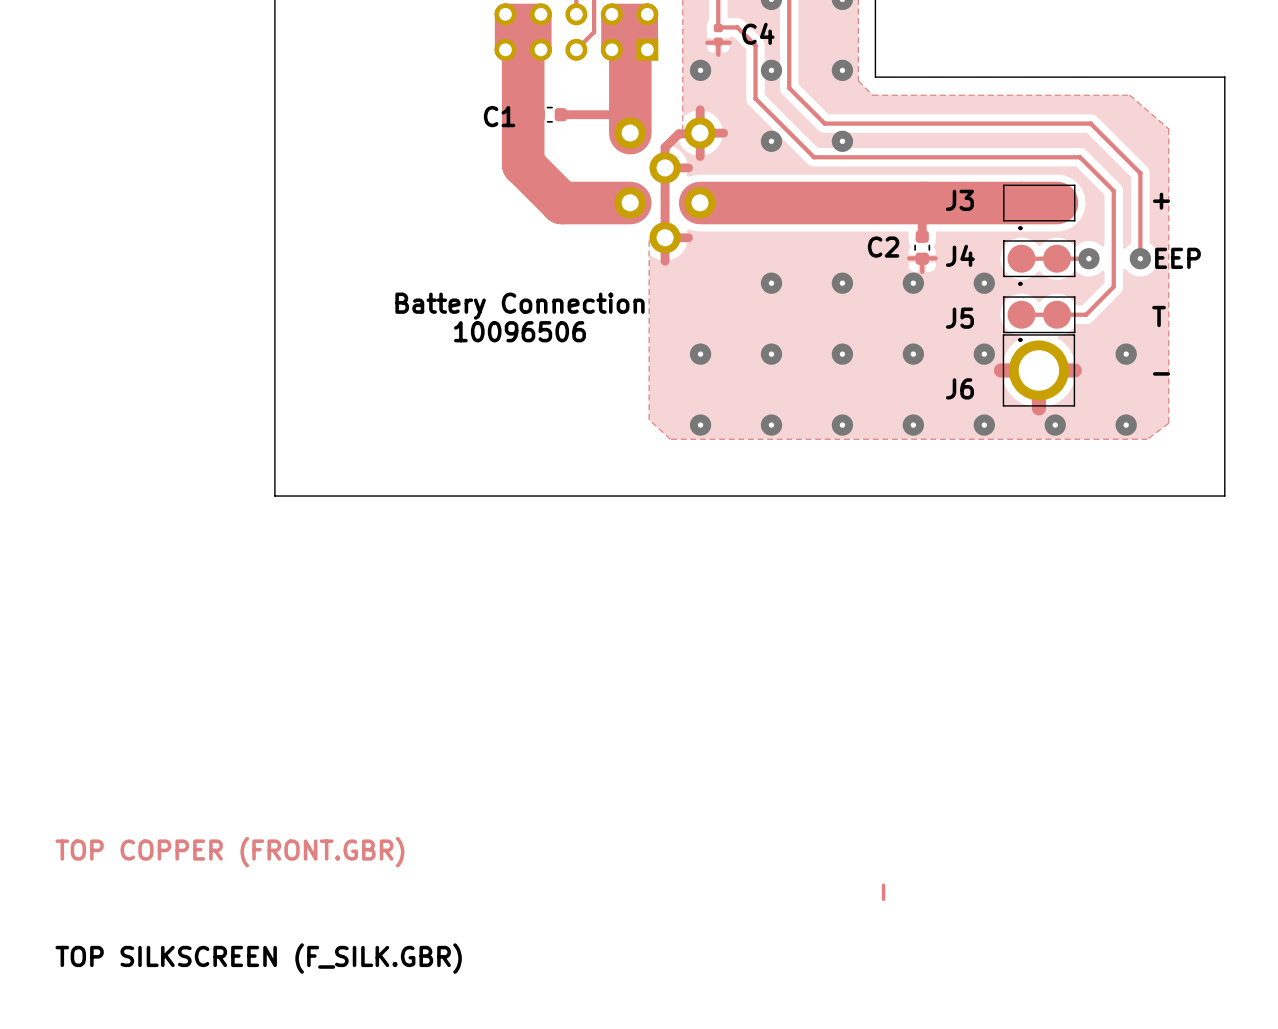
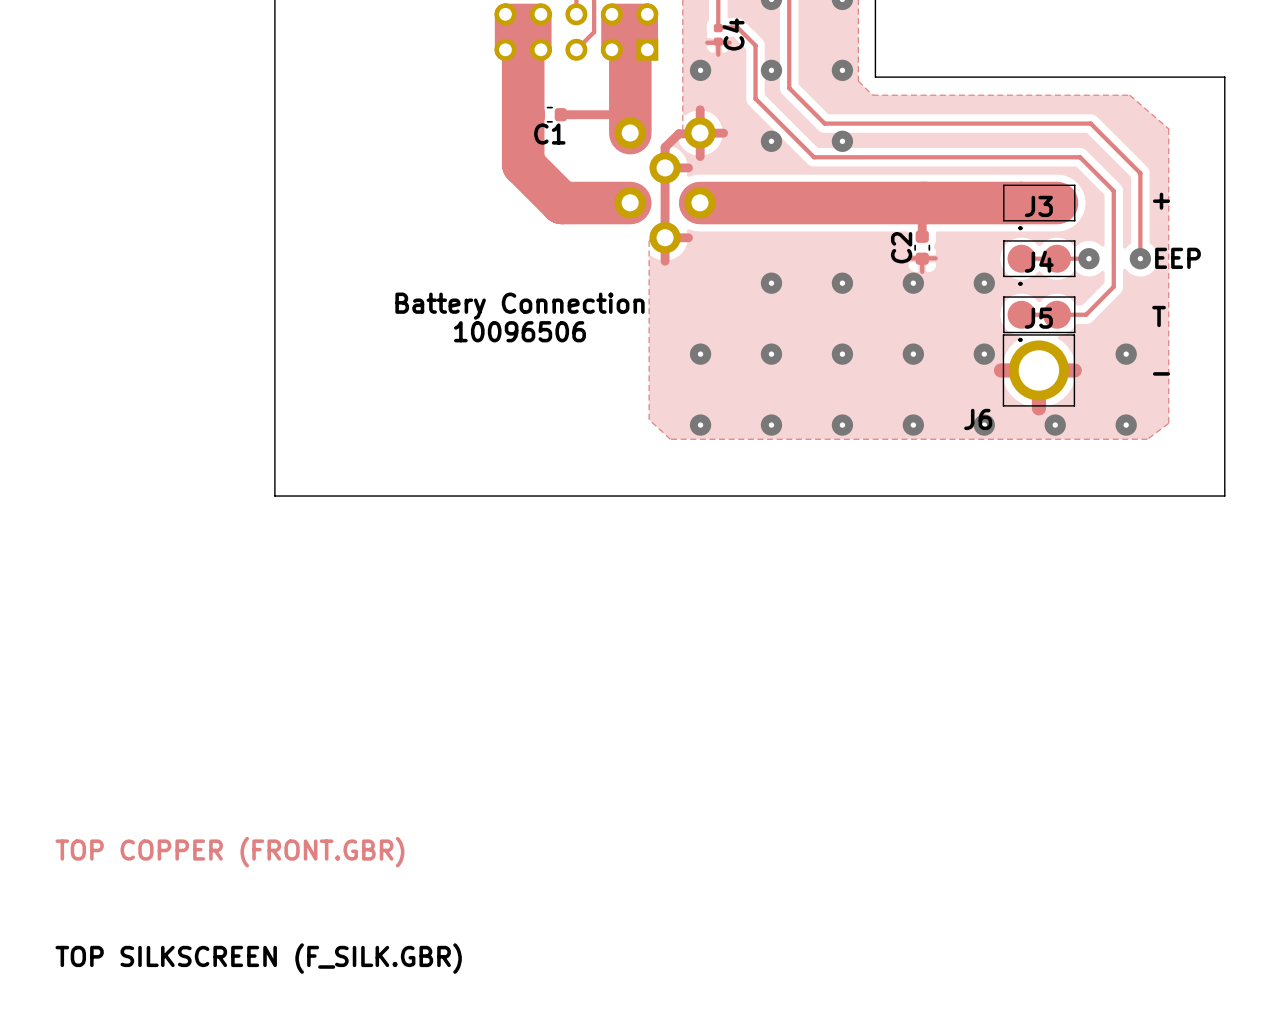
C4 name rotation: 0° (758, 33) -> 90° counterclockwise (733, 34)
C1 name position: C1 (499, 116) -> C1 (549, 134)
J3 name position: J3 (959, 200) -> J3 (1038, 206)
C2 name rotation: 0° (883, 247) -> 90° counterclockwise (901, 247)
J4 name position: J4 (960, 255) -> J4 (1039, 261)
J5 name position: J5 (959, 318) -> J5 (1038, 318)
J6 name position: J6 (959, 388) -> J6 (978, 419)
track: (883, 885) (883, 899) -> none

